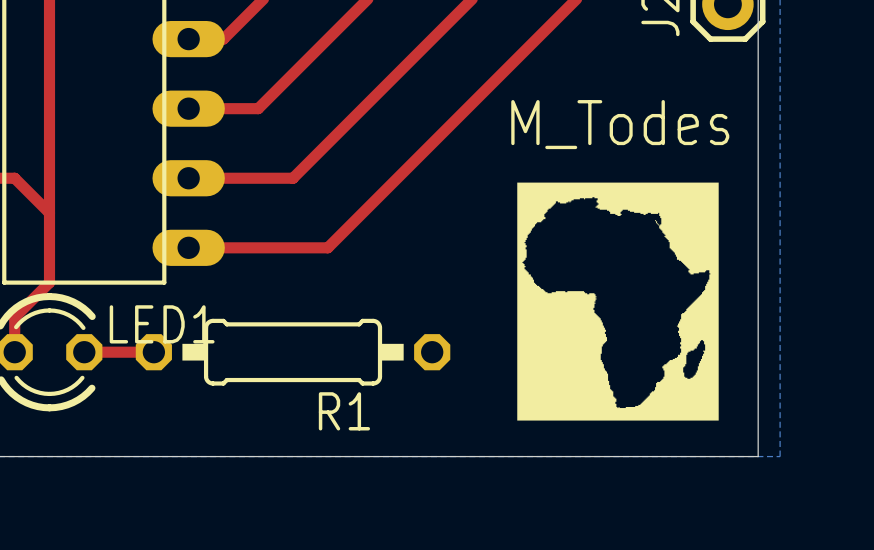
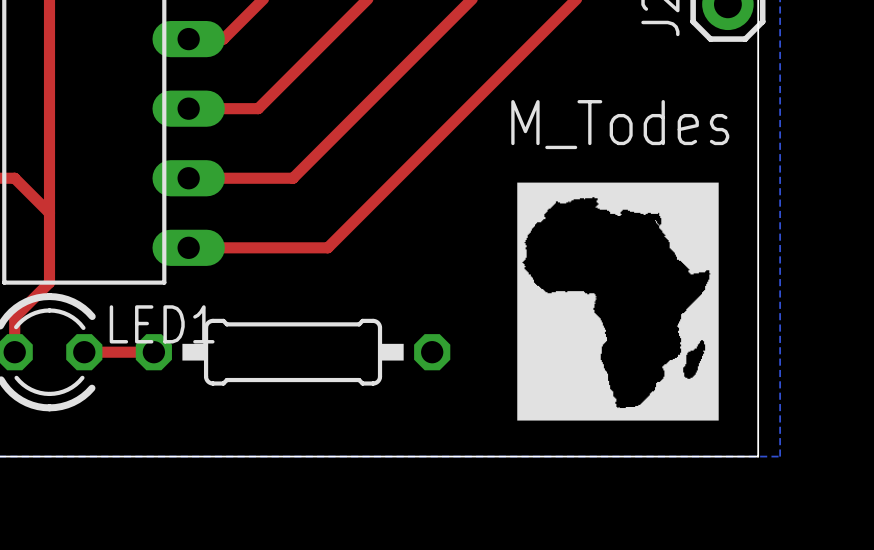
R1 name: R1 (344, 411) -> none

